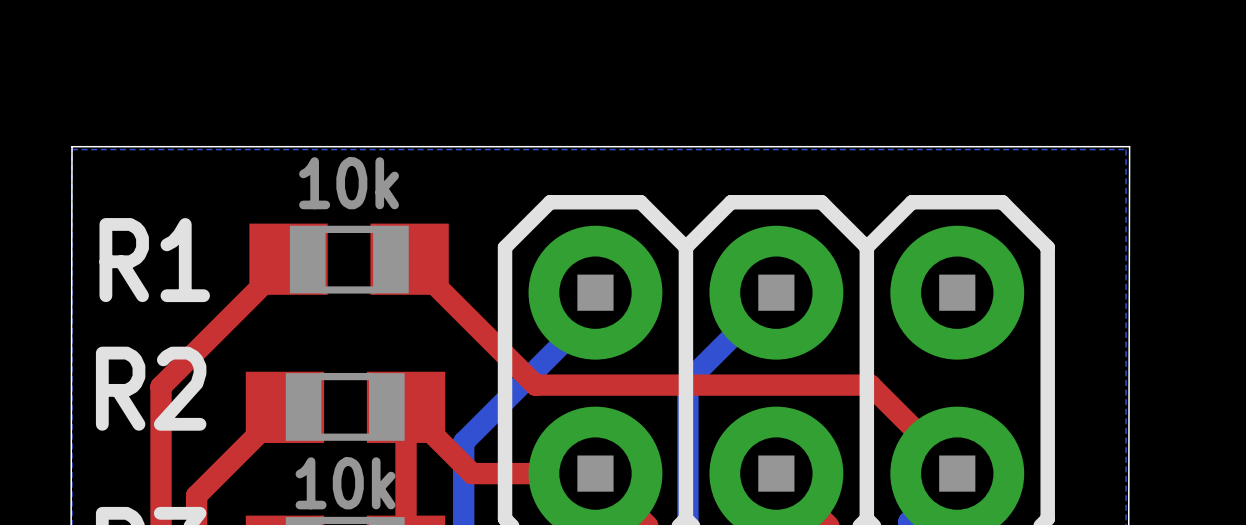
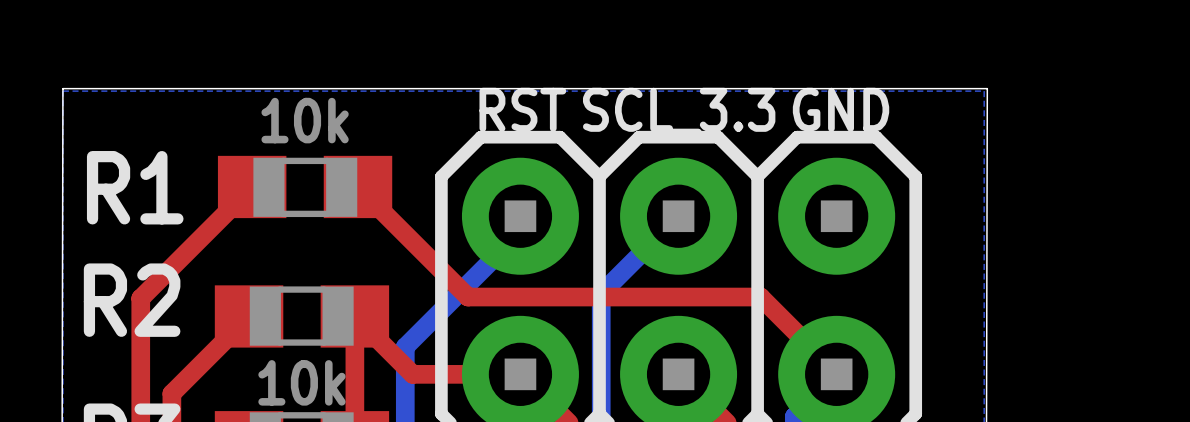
text: none -> RST (522, 109)
text: none -> GND (841, 109)
text: none -> SCL_3.3 (679, 111)

